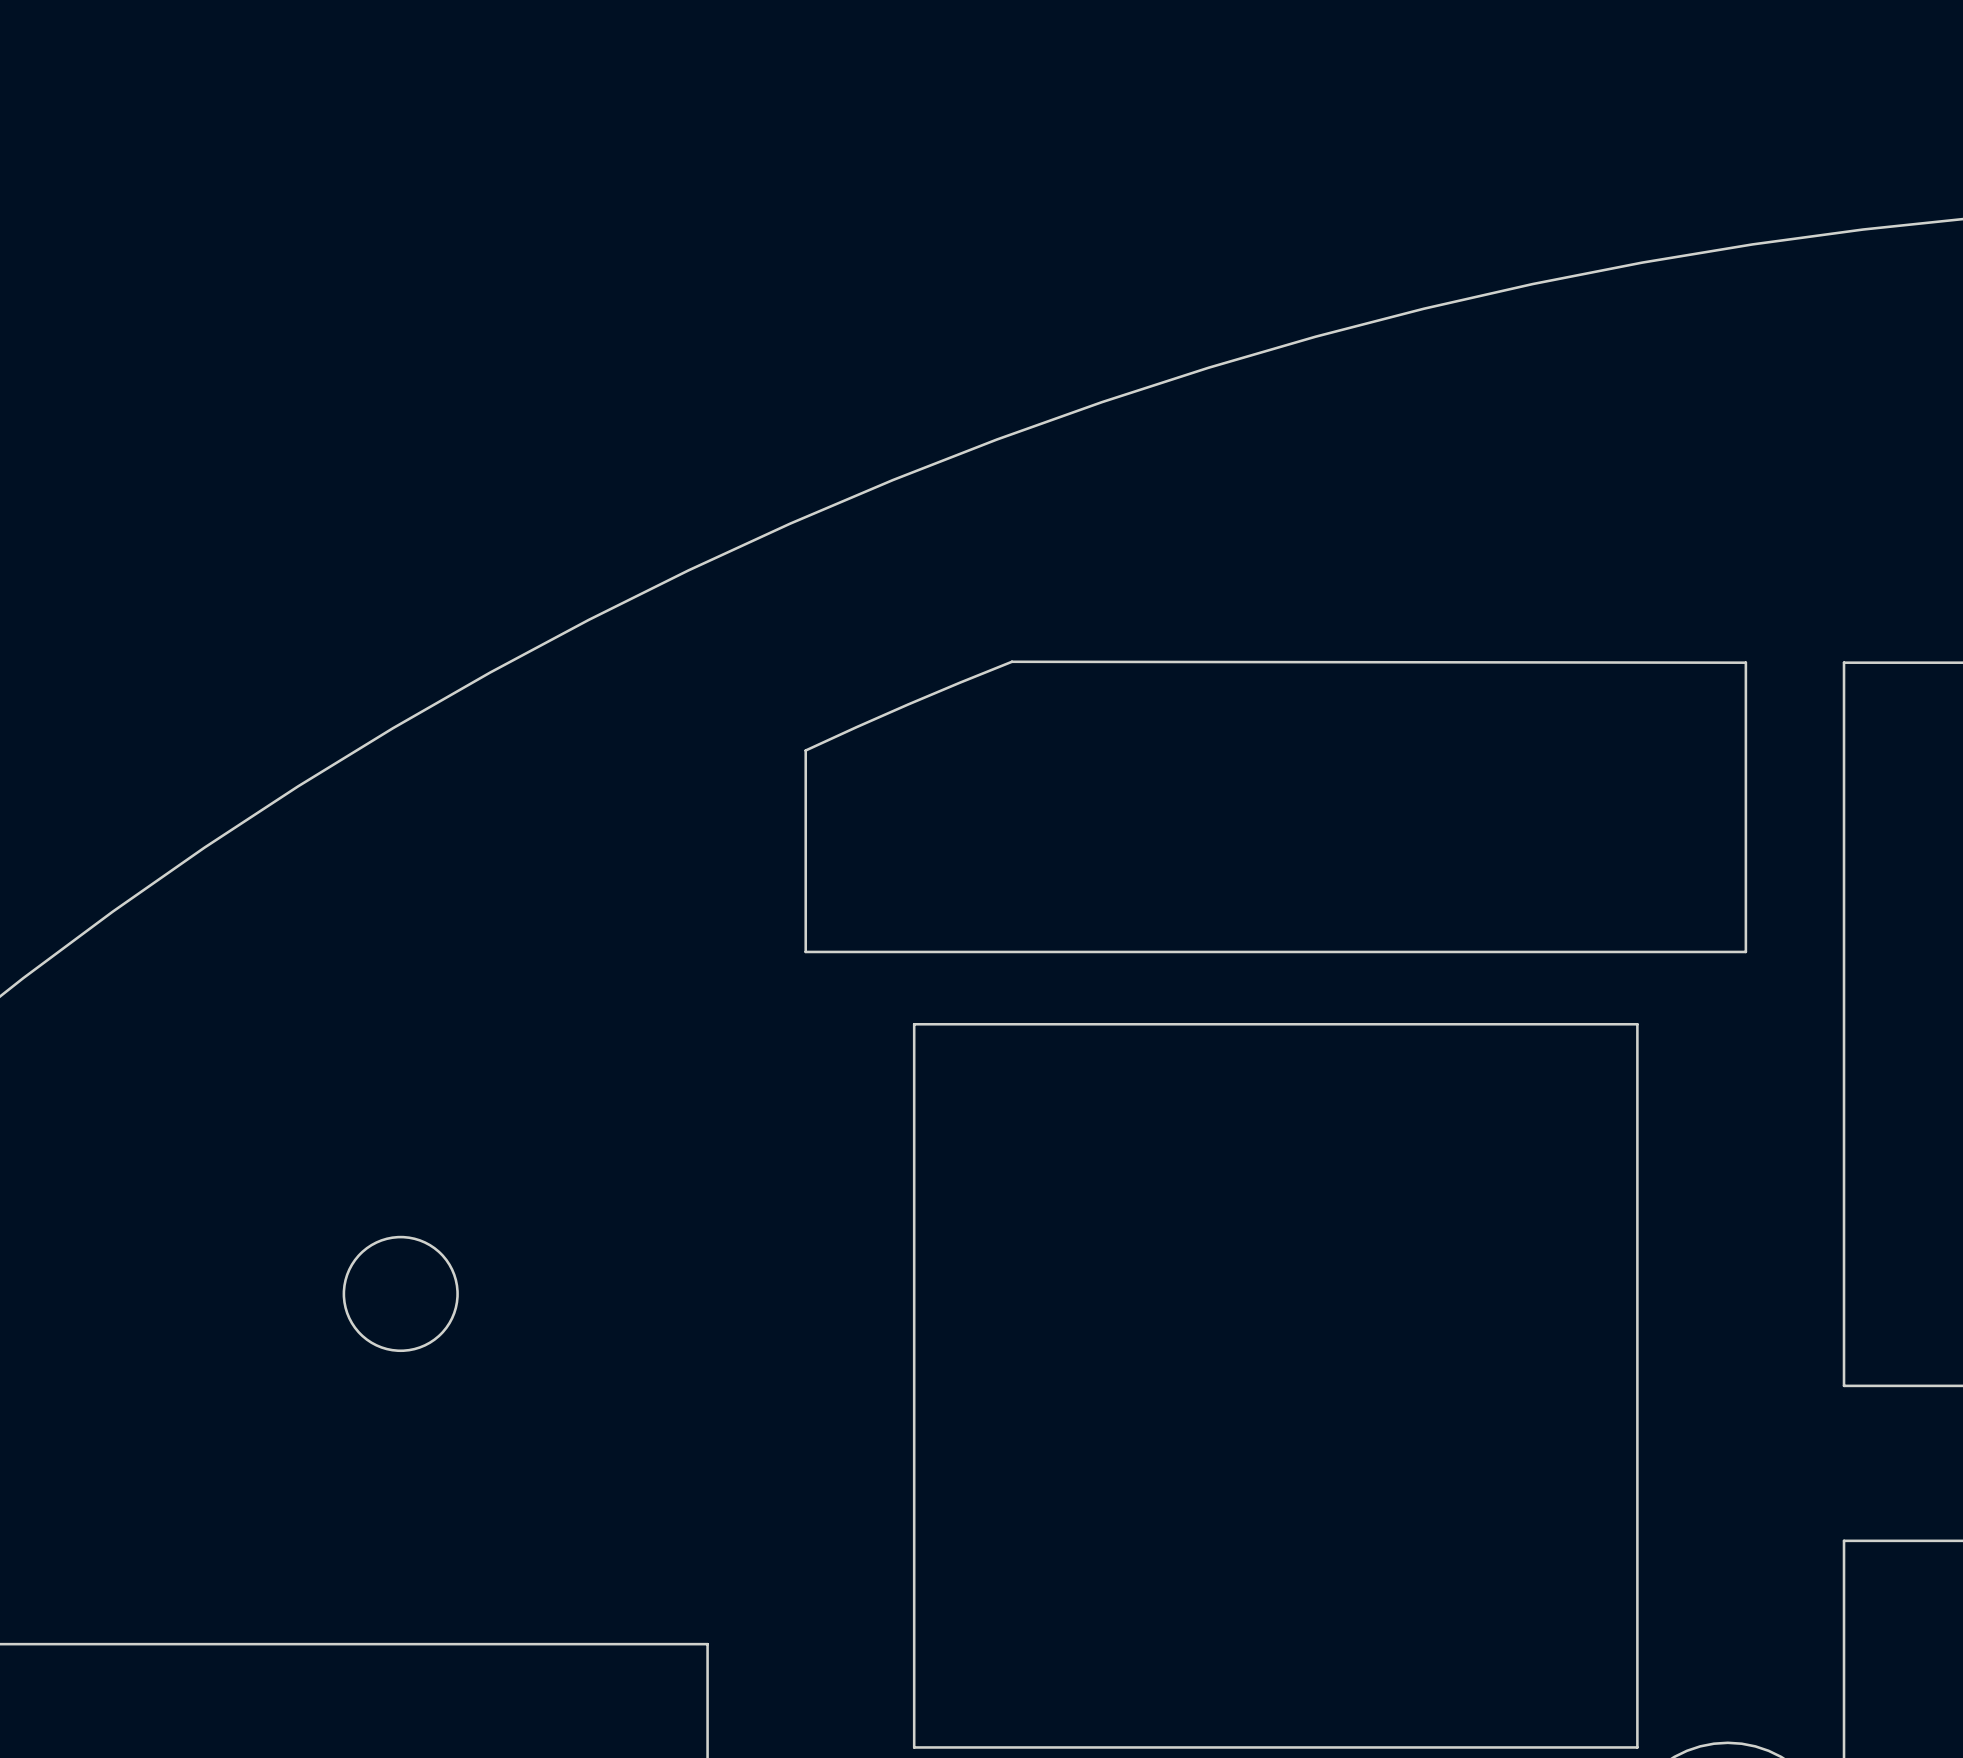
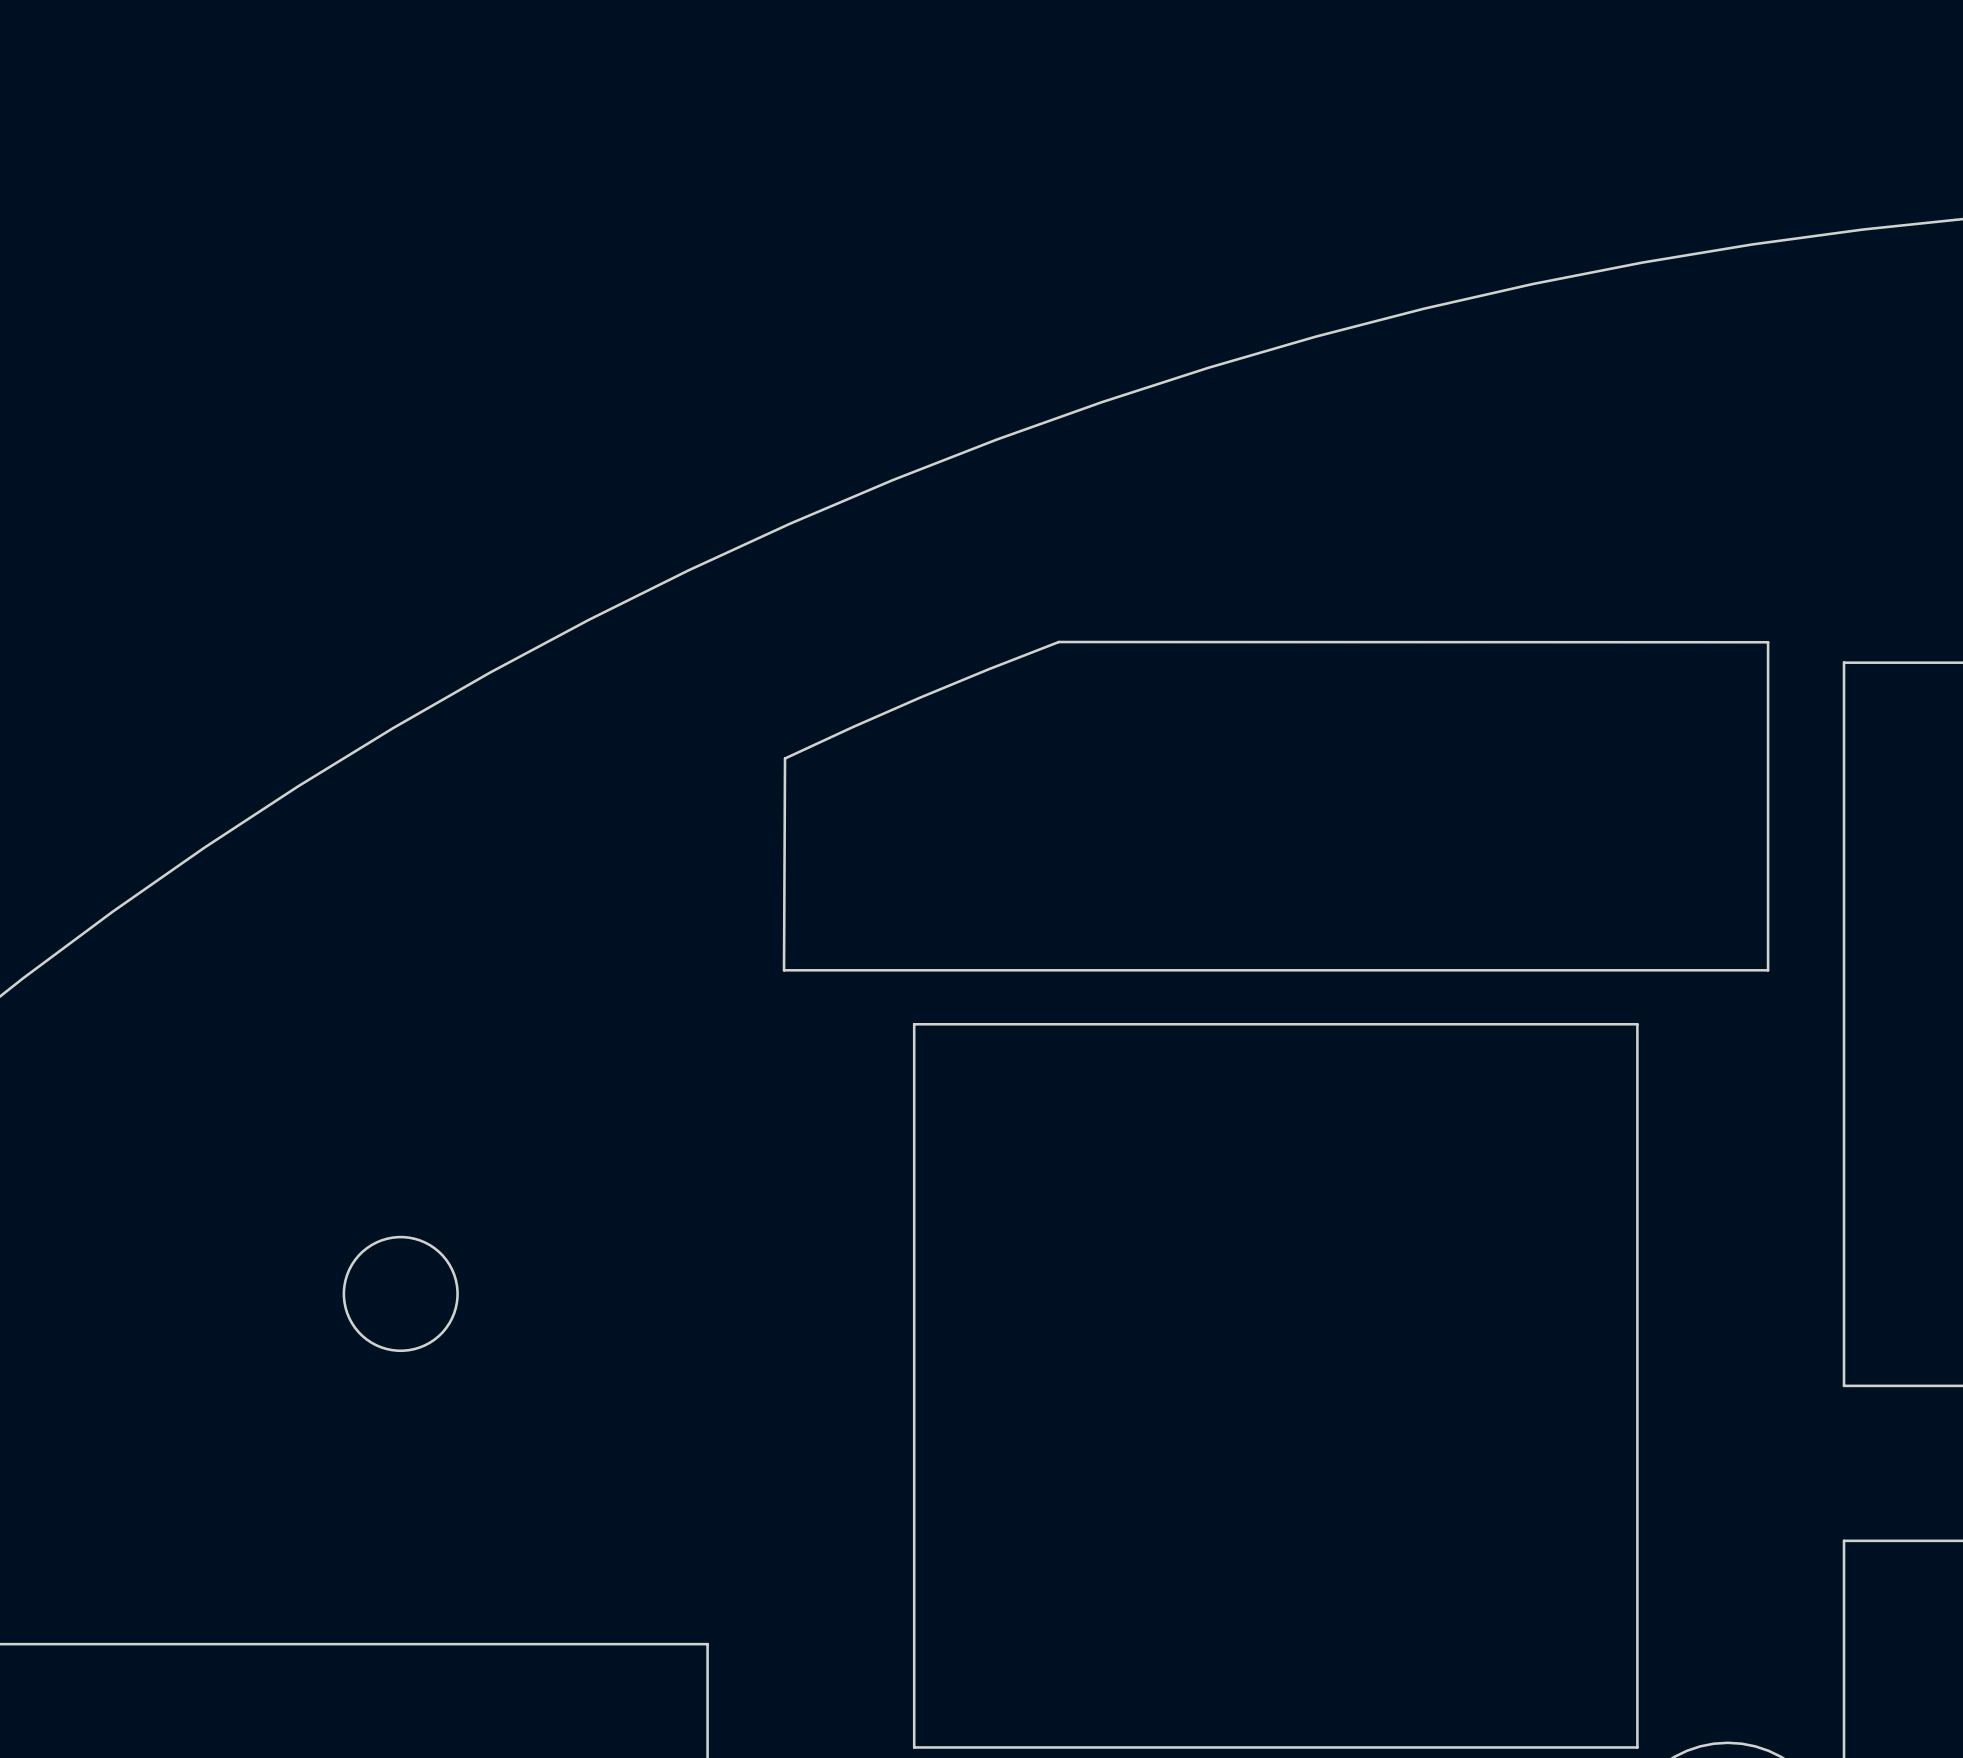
board edge: (1011, 661) (1745, 662) (1745, 951) (805, 951) (805, 750) (908, 704) (1011, 661) -> (1058, 642) (1768, 642) (1768, 970) (784, 970) (785, 758) (920, 697) (1058, 642)

